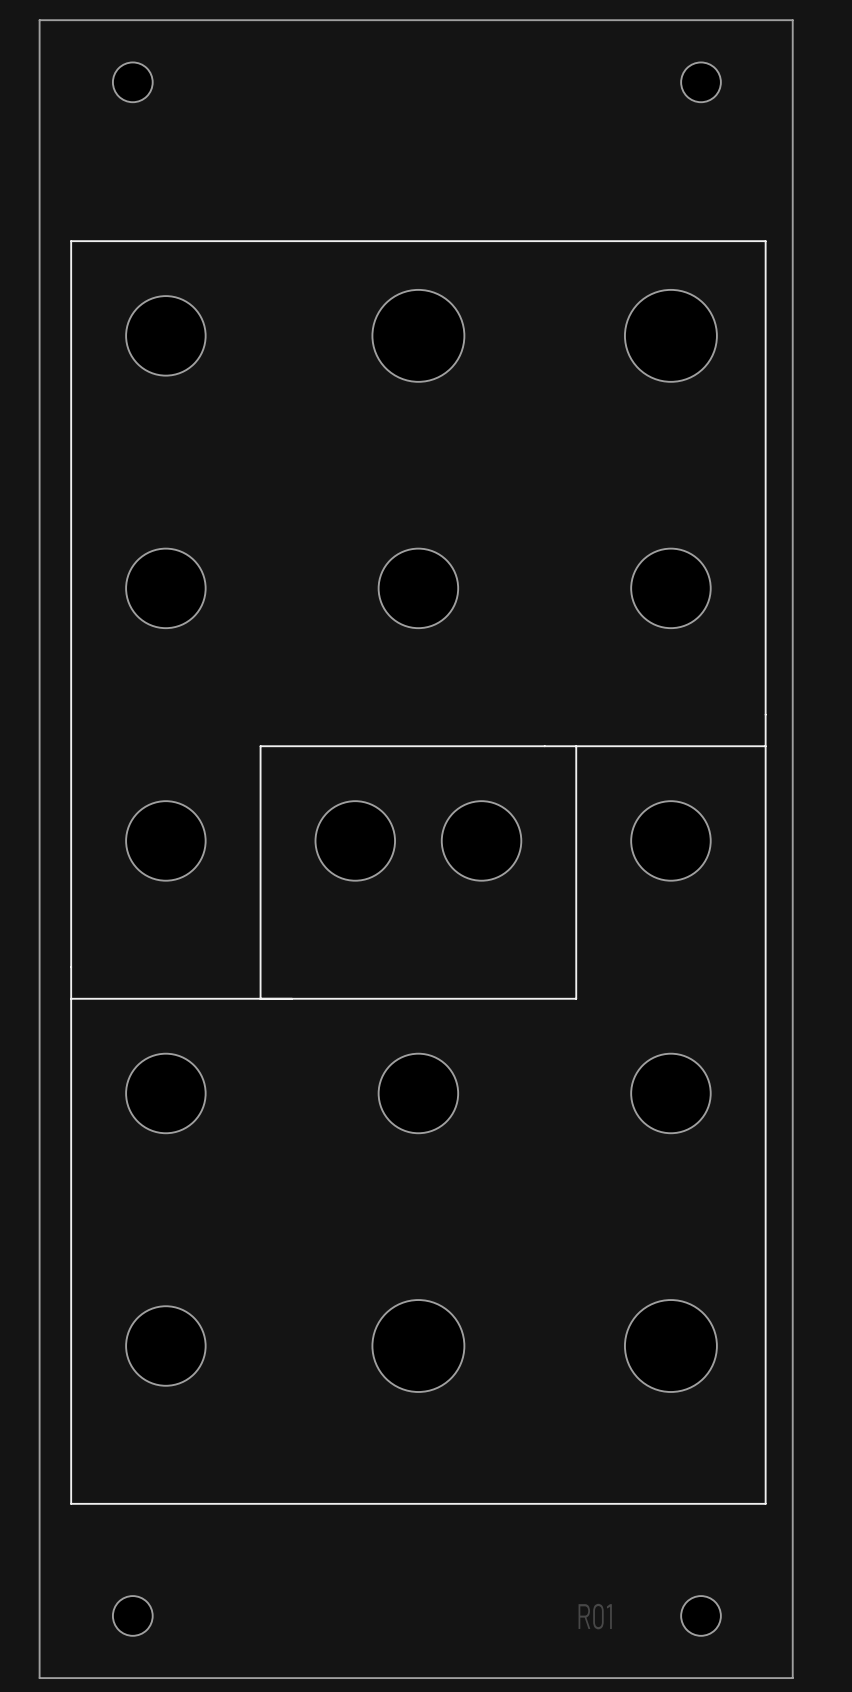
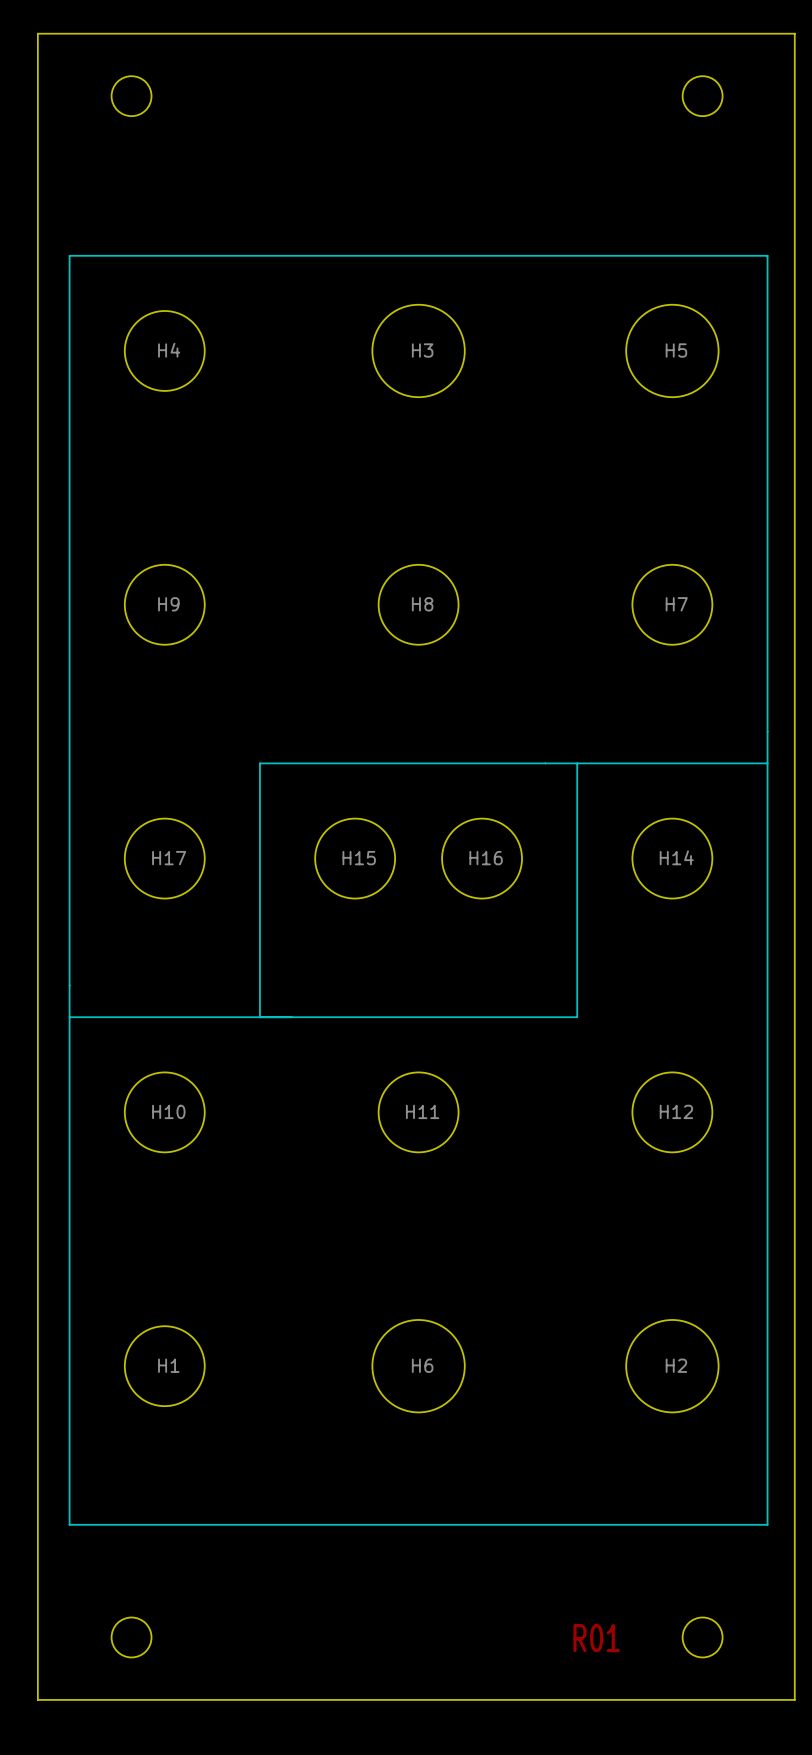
H4 name: none -> H4 (169, 350)
H3 name: none -> H3 (422, 350)
H5 name: none -> H5 (676, 350)
H9 name: none -> H9 (168, 604)
H8 name: none -> H8 (422, 604)
H7 name: none -> H7 (676, 604)
H17 name: none -> H17 (169, 858)
H15 name: none -> H15 (359, 858)
H16 name: none -> H16 (486, 858)
H14 name: none -> H14 (676, 857)
H12 name: none -> H12 (676, 1111)
H10 name: none -> H10 (168, 1111)
H11 name: none -> H11 (422, 1111)
H1 name: none -> H1 (168, 1365)
H6 name: none -> H6 (422, 1365)
H2 name: none -> H2 (676, 1365)

